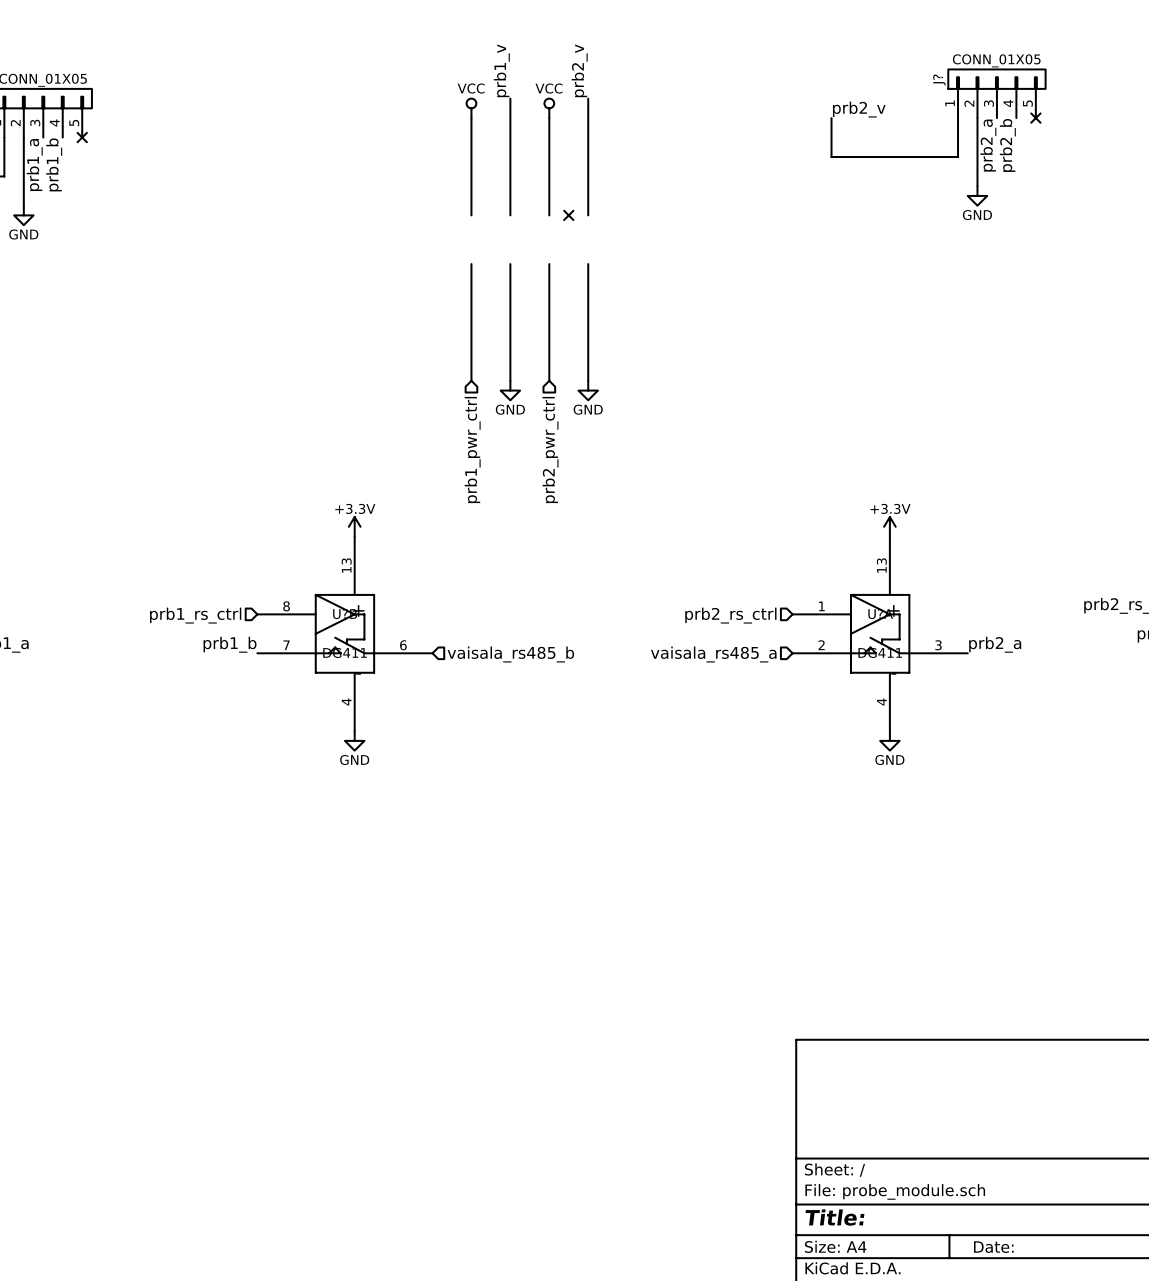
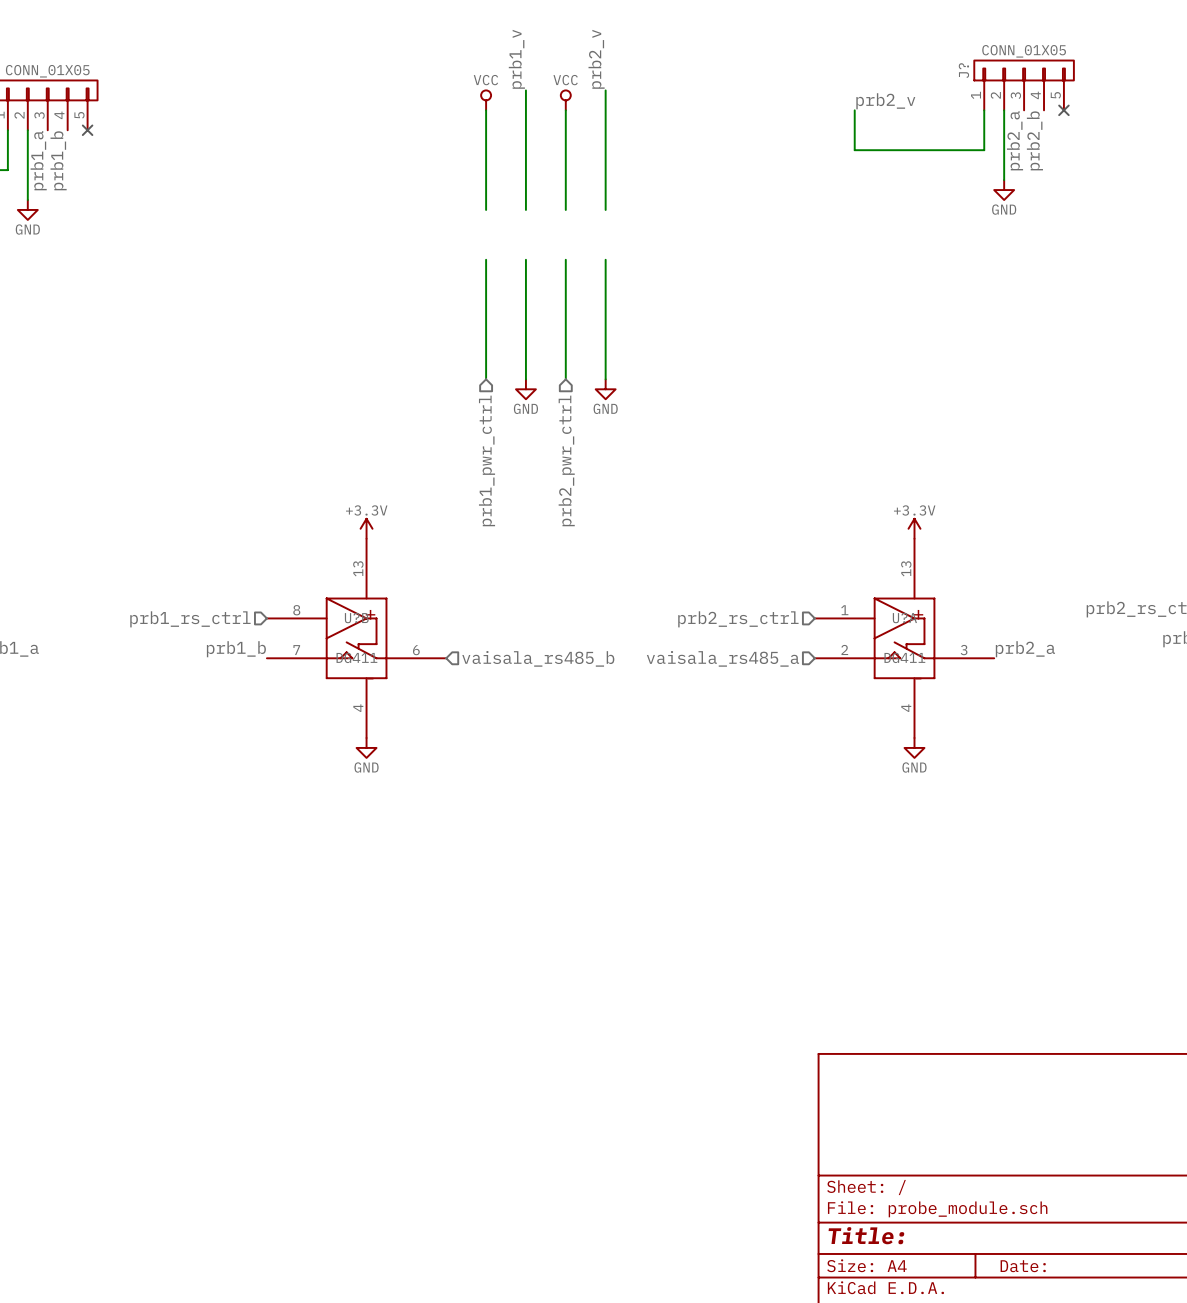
no-connect mark: (568, 215) -> none

